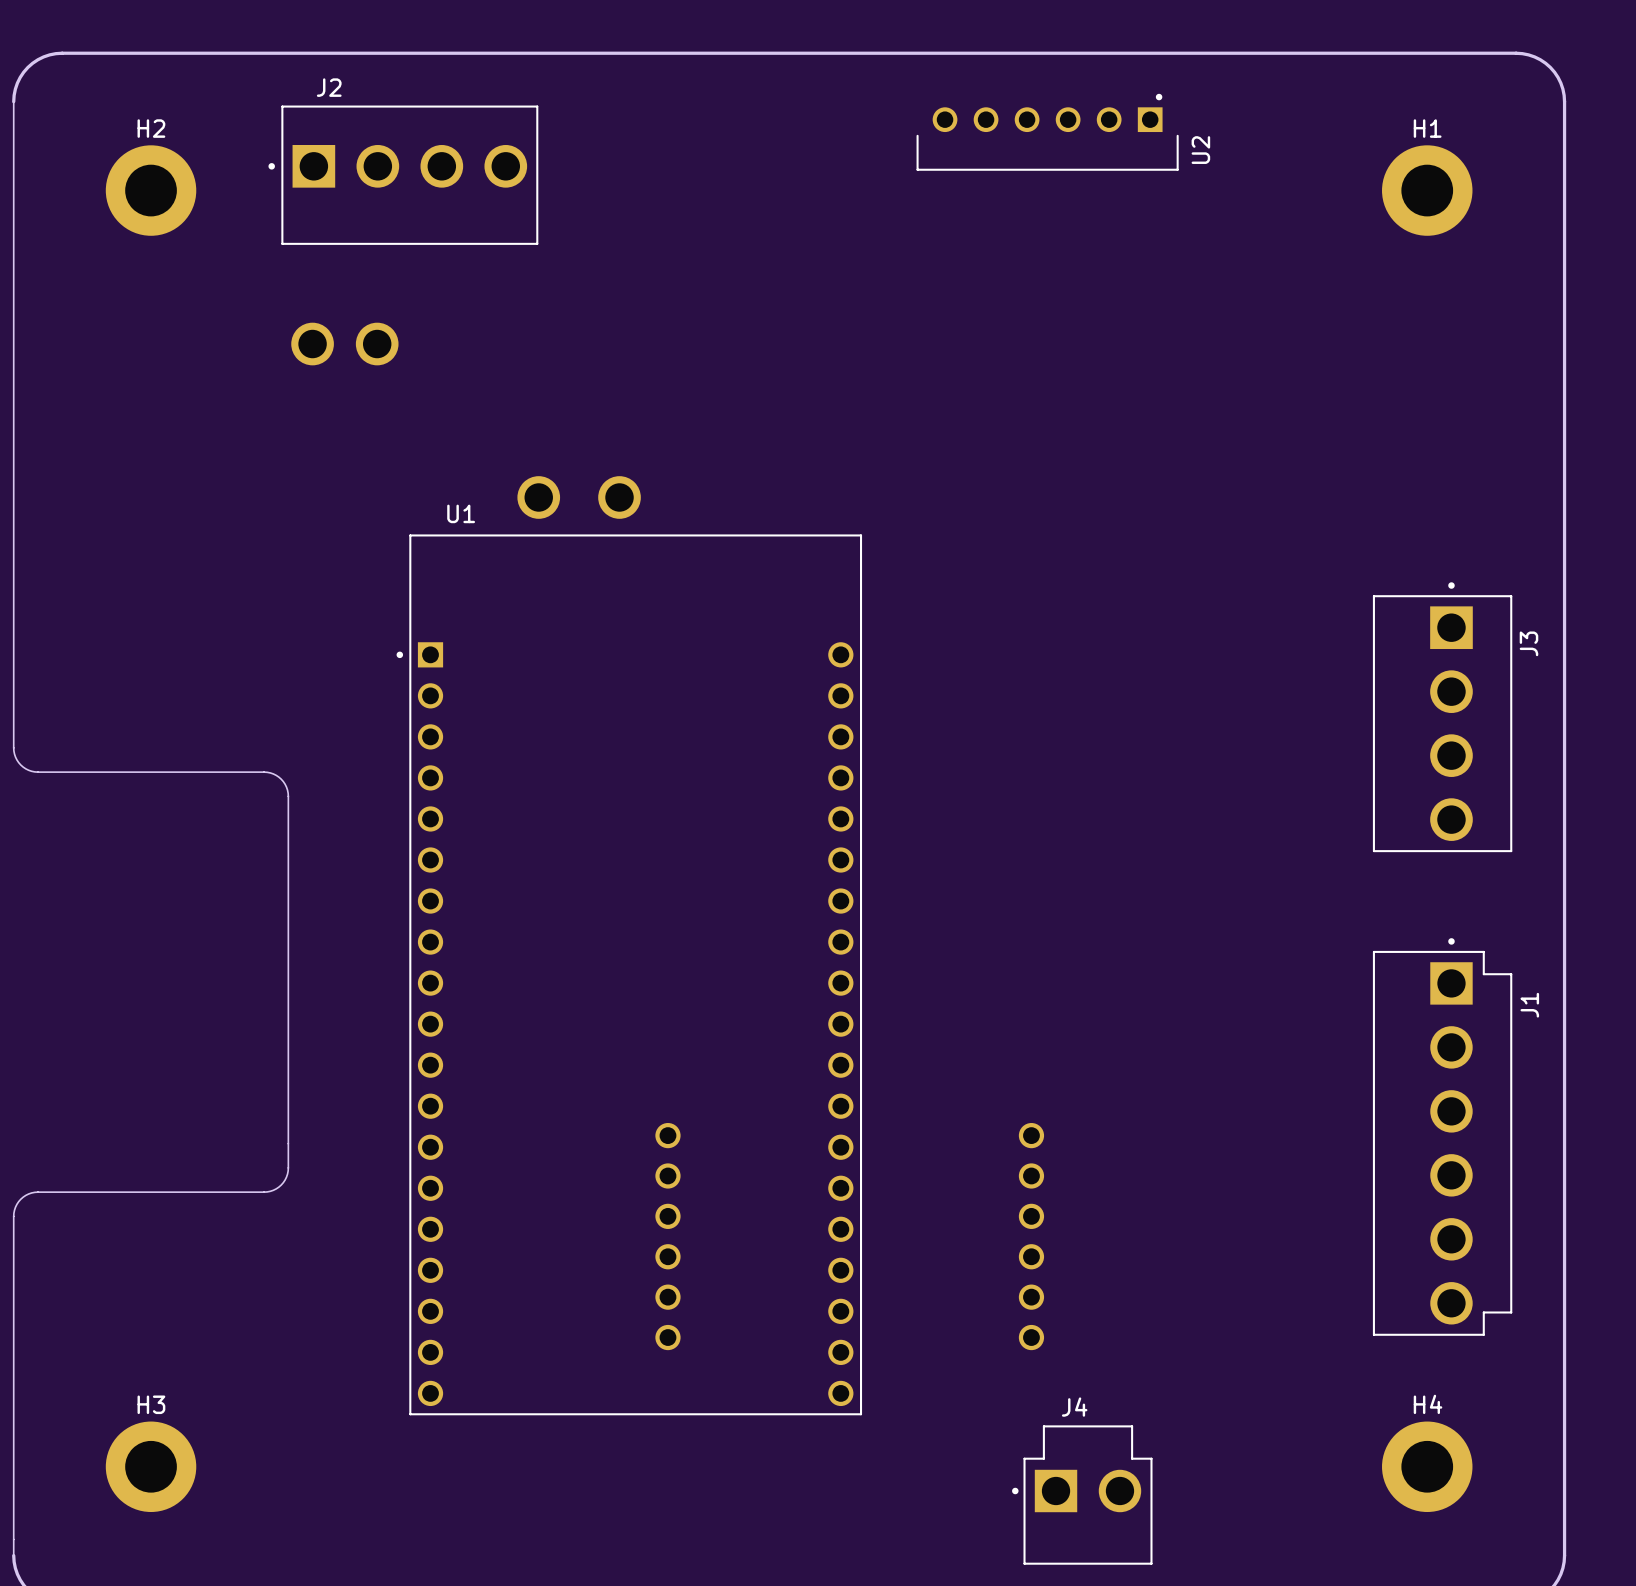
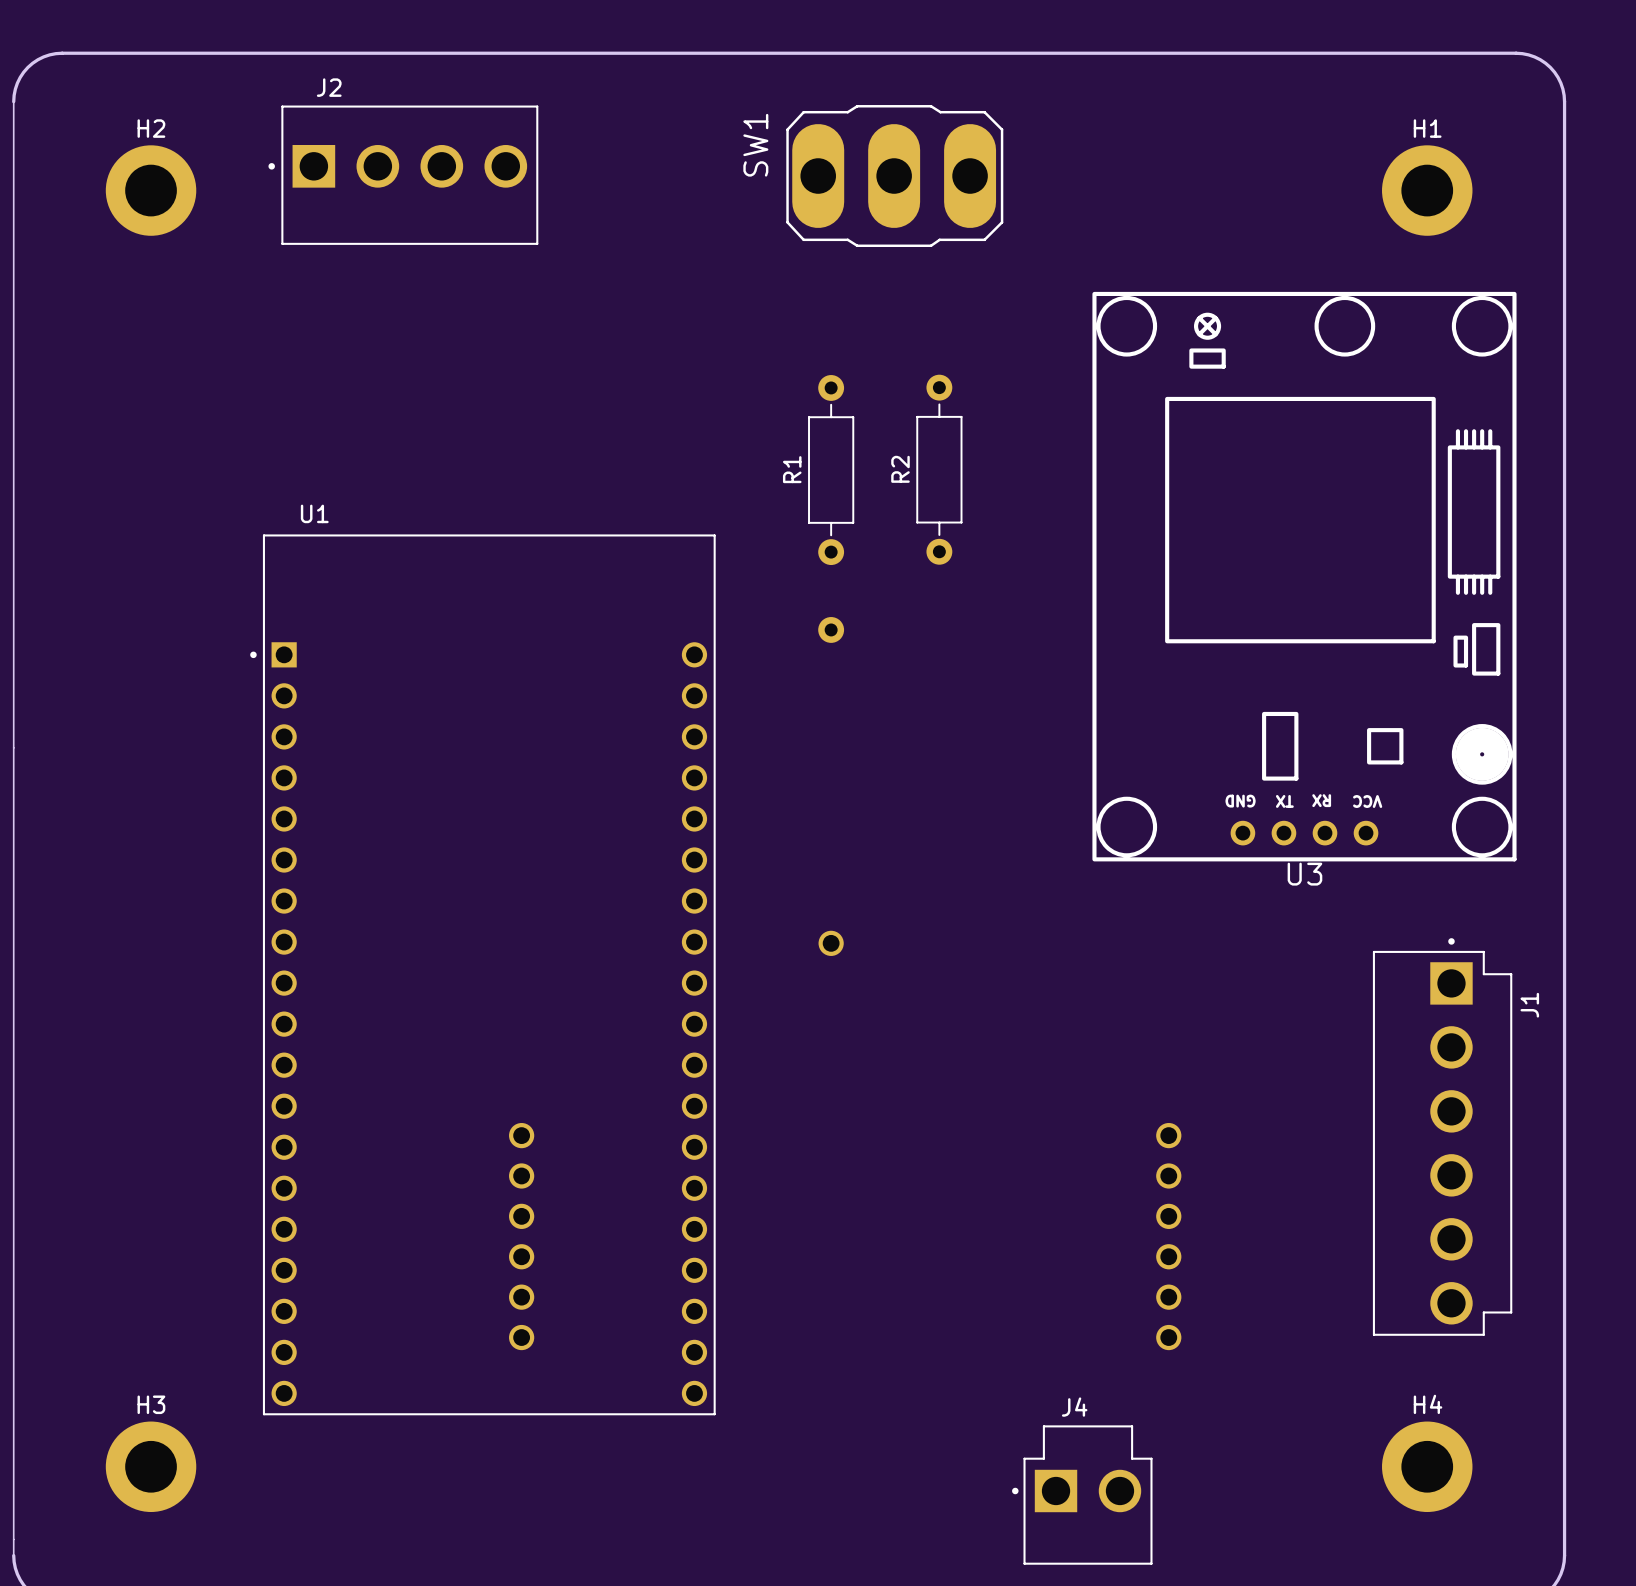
U2: (1047, 132) -> none
SW1: none -> (894, 176)
part: (312, 344) -> none
part: (377, 344) -> none
R2: none -> (939, 469)
R1: none -> (831, 470)
part: (538, 497) -> none
part: (619, 497) -> none
U3: none -> (1304, 576)
part: none -> (831, 629)
J3: (1442, 717) -> none
board edge: (13, 747) (18, 762) (25, 768) (34, 771) (267, 772) (281, 779) (286, 787) (288, 796) (288, 1167) (285, 1180) (276, 1188) (264, 1192) (34, 1192) (20, 1199) (15, 1207) (13, 1216) -> (13, 747) (13, 1216)
part: none -> (831, 943)
U1 position: (629, 974) -> (482, 974)
part: none -> (521, 1135)
part: (667, 1135) -> none
part: (1031, 1135) -> none
part: none -> (1168, 1135)
part: none -> (521, 1175)
part: (667, 1175) -> none
part: (1031, 1175) -> none
part: none -> (1168, 1175)
part: none -> (521, 1216)
part: (667, 1216) -> none
part: (1031, 1216) -> none
part: none -> (1168, 1216)
part: none -> (521, 1256)
part: (667, 1256) -> none
part: (1031, 1256) -> none
part: none -> (1168, 1256)
part: none -> (521, 1297)
part: (667, 1297) -> none
part: (1031, 1297) -> none
part: none -> (1168, 1297)
part: none -> (521, 1337)
part: (667, 1337) -> none
part: (1031, 1337) -> none
part: none -> (1168, 1337)

